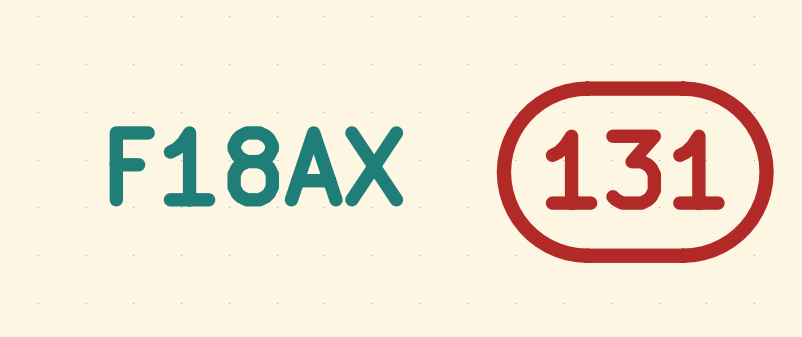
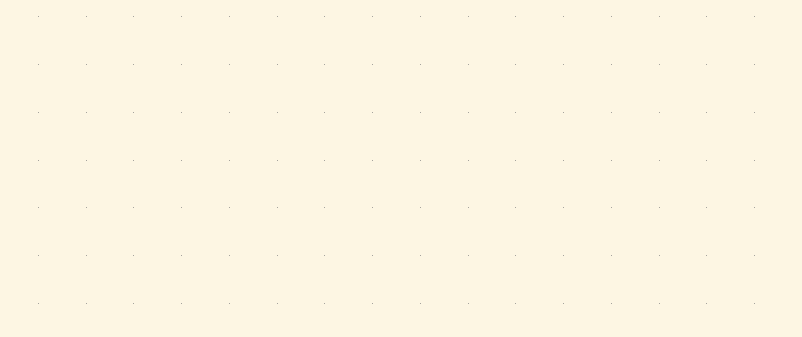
part: (635, 172) -> none

